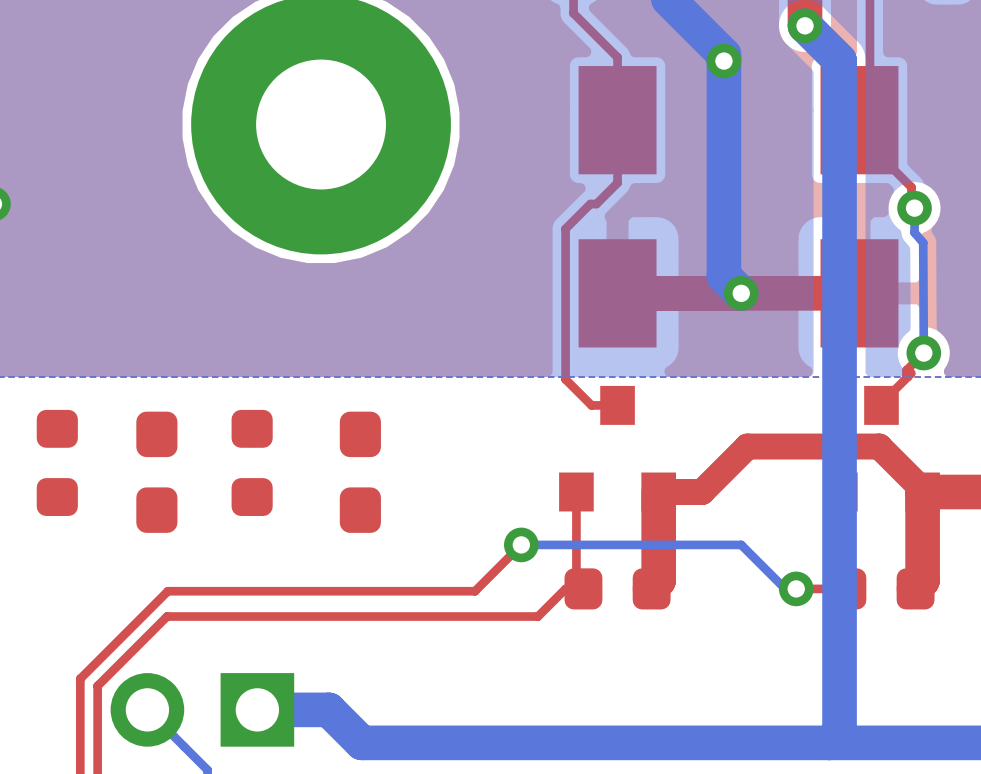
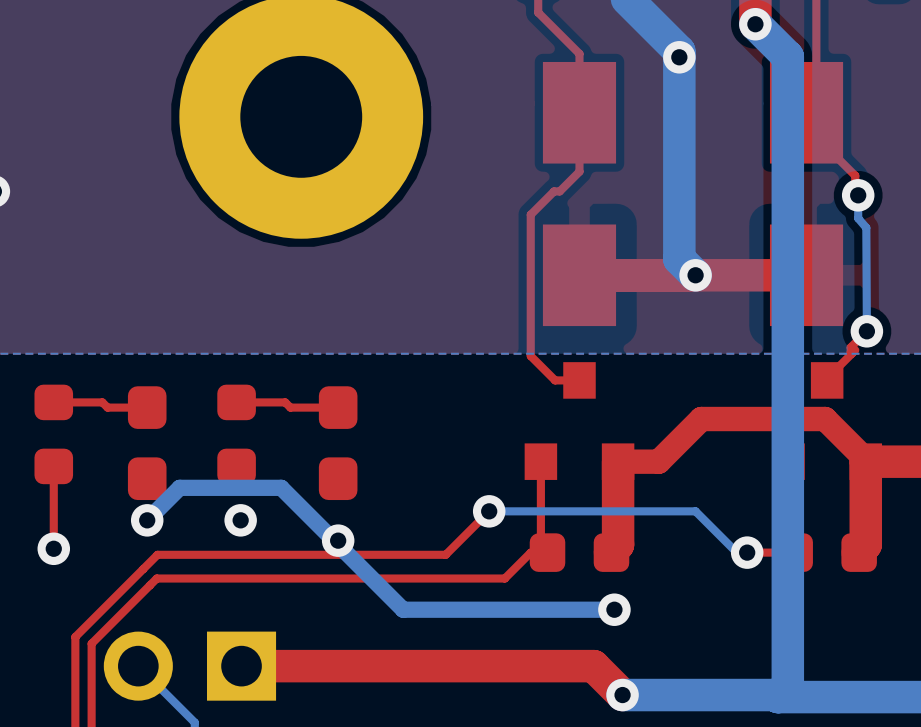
top track: none -> (53, 402) (102, 402) (107, 407) (147, 407)
top track: none -> (236, 402) (285, 402) (290, 407) (338, 407)
top track: none -> (53, 466) (53, 548)
bottom track: none -> (147, 520) (179, 487) (281, 487) (403, 609) (614, 609)
via: none -> (147, 520)
via: none -> (240, 520)
via: none -> (338, 540)
via: none -> (53, 548)
via: none -> (614, 609)
top track: none -> (241, 666) (593, 666) (622, 695)
bottom track: (257, 709) (328, 709) (361, 742) (829, 742) -> (622, 695) (776, 695) (778, 697)
via: none -> (622, 695)

